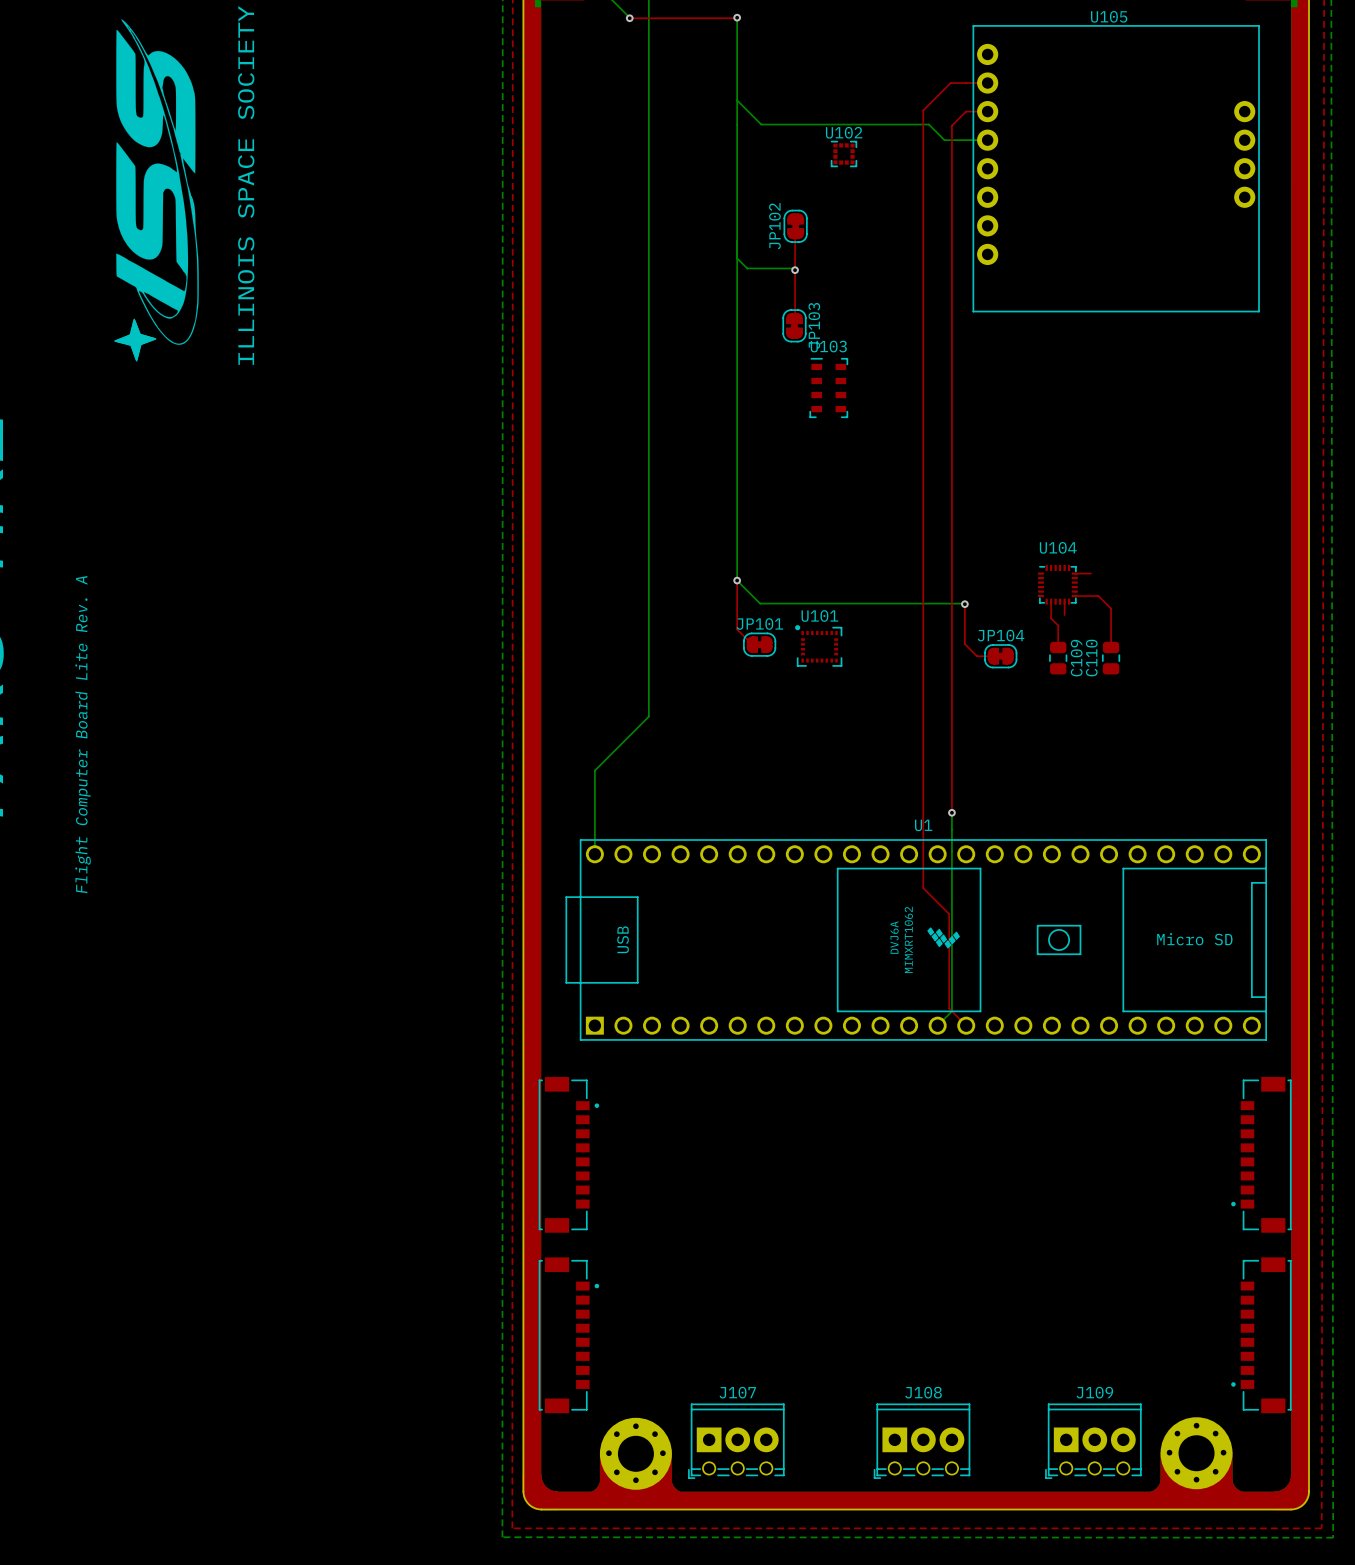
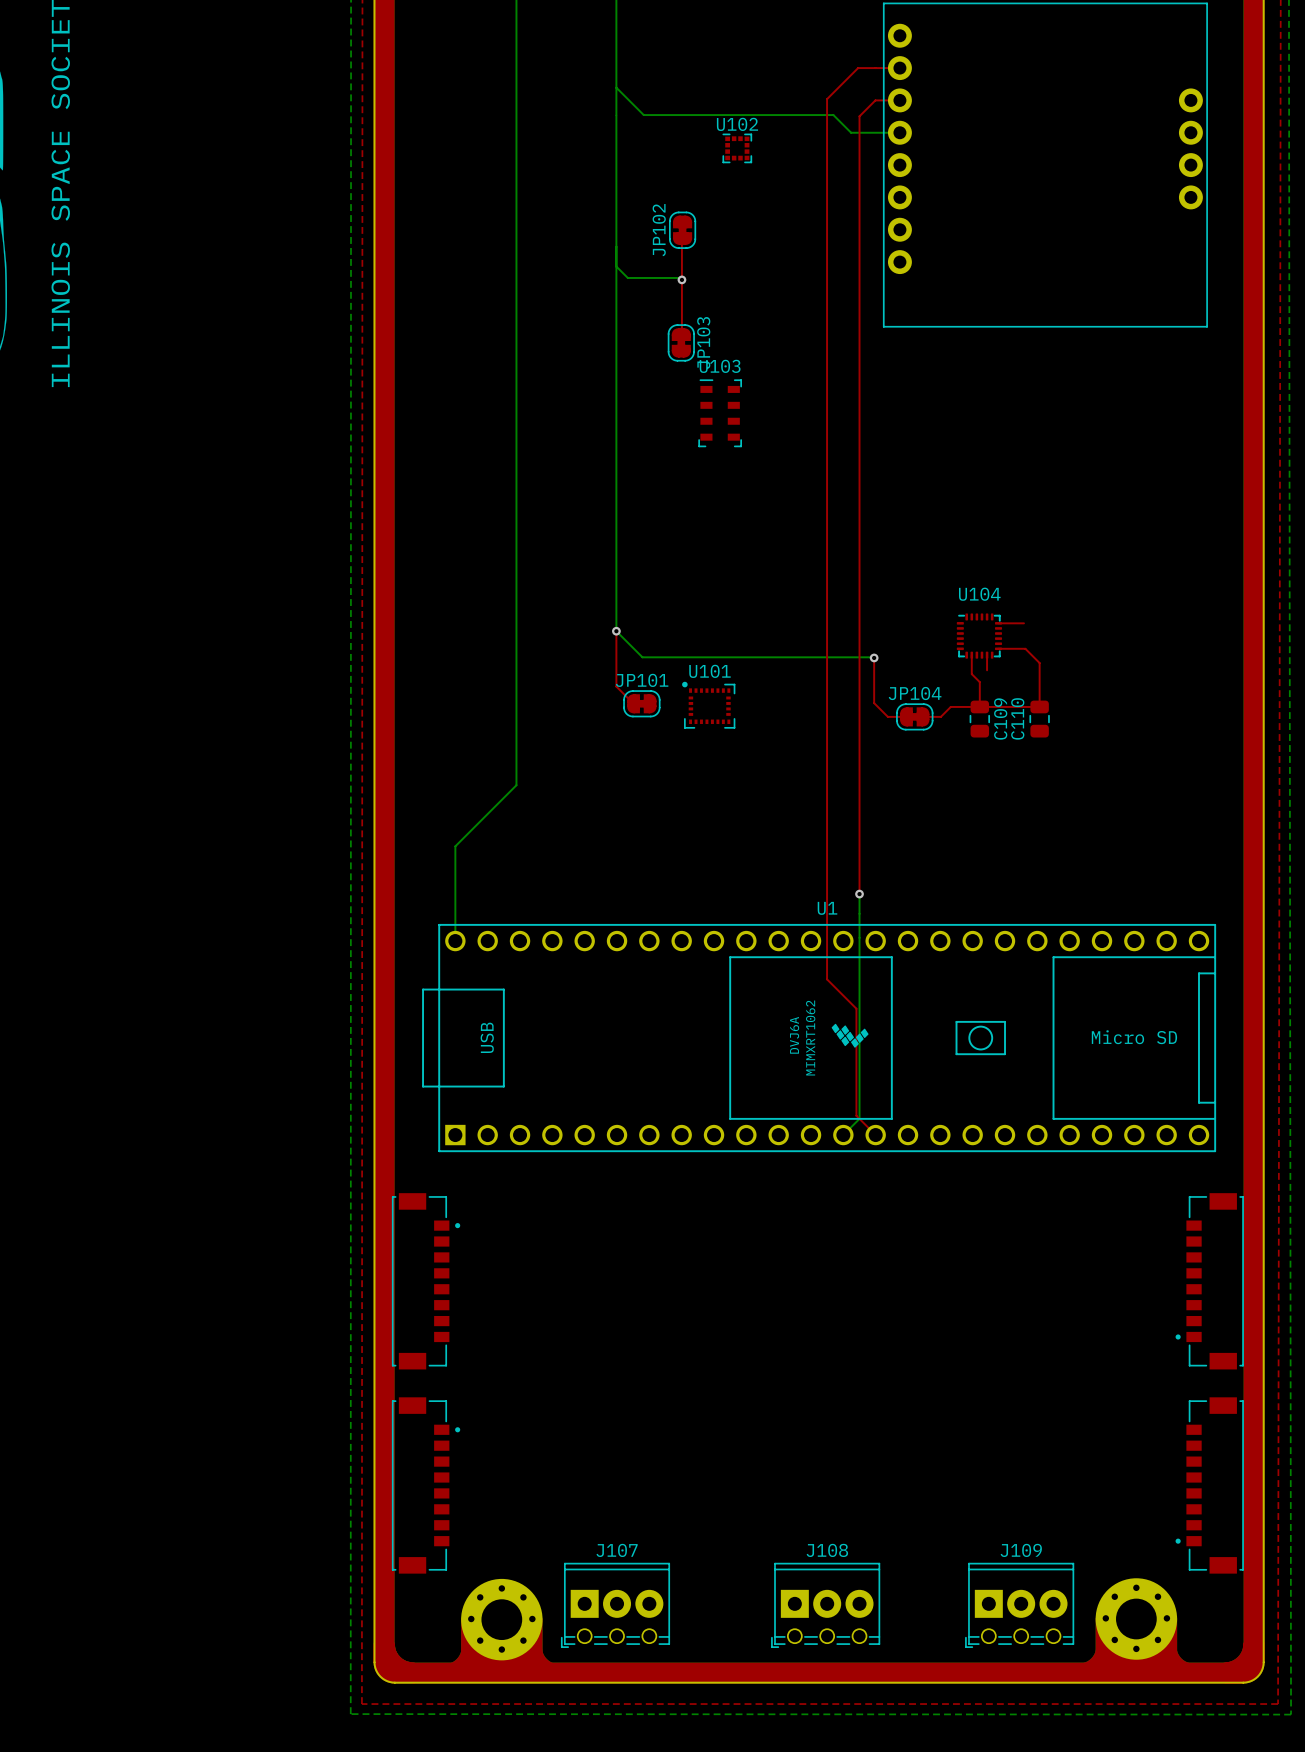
top track: none -> (1016, 623) (1023, 623)
top track: none -> (1039, 706) (950, 706) (940, 716) (923, 716)

